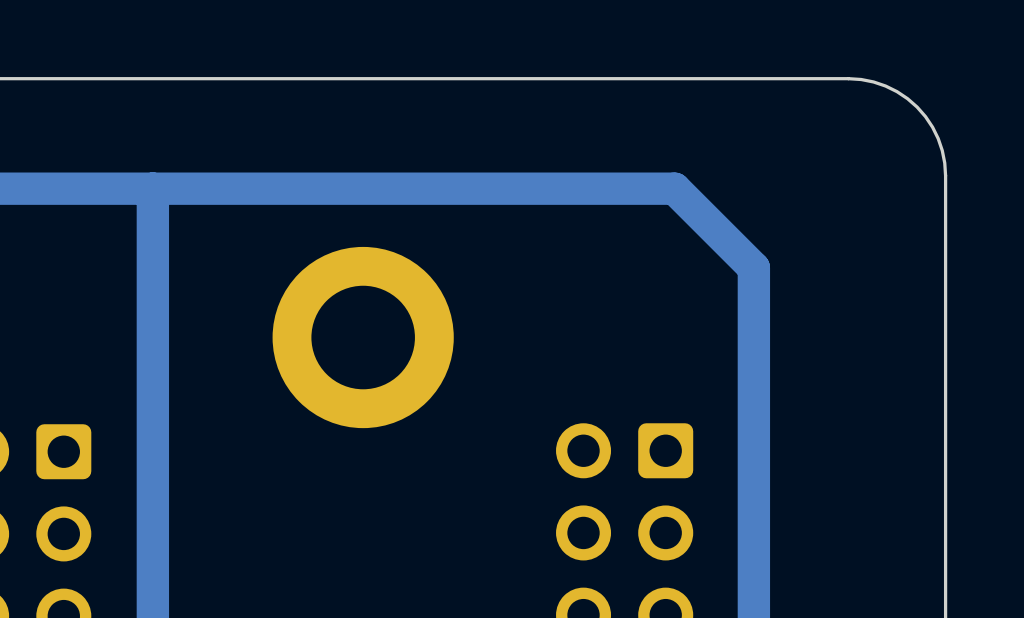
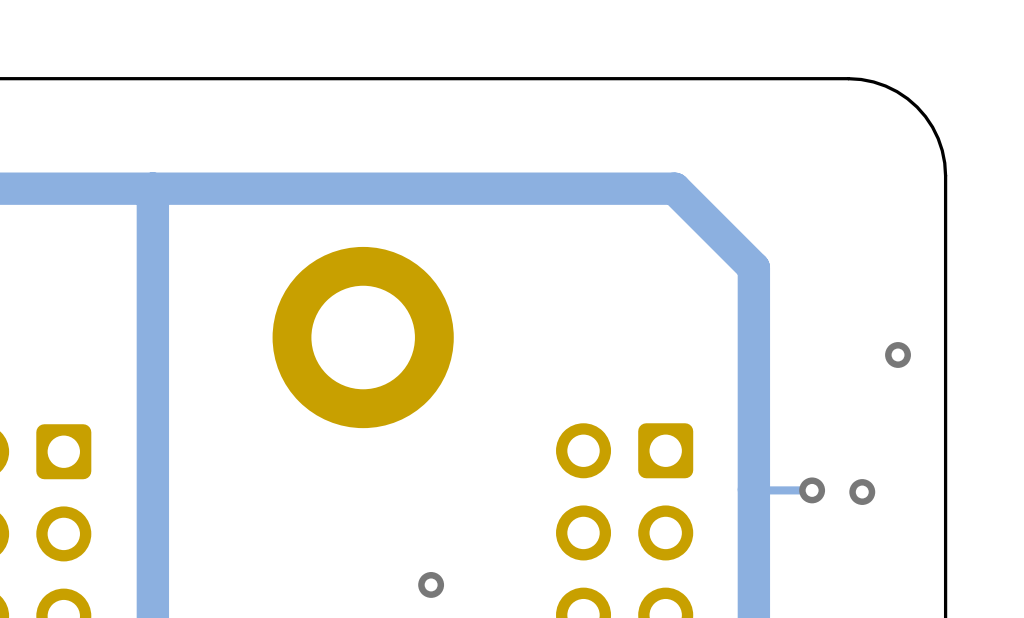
via: none -> (898, 354)
track: none -> (753, 489) (812, 490)
via: none -> (812, 490)
via: none -> (862, 492)
via: none -> (431, 584)

